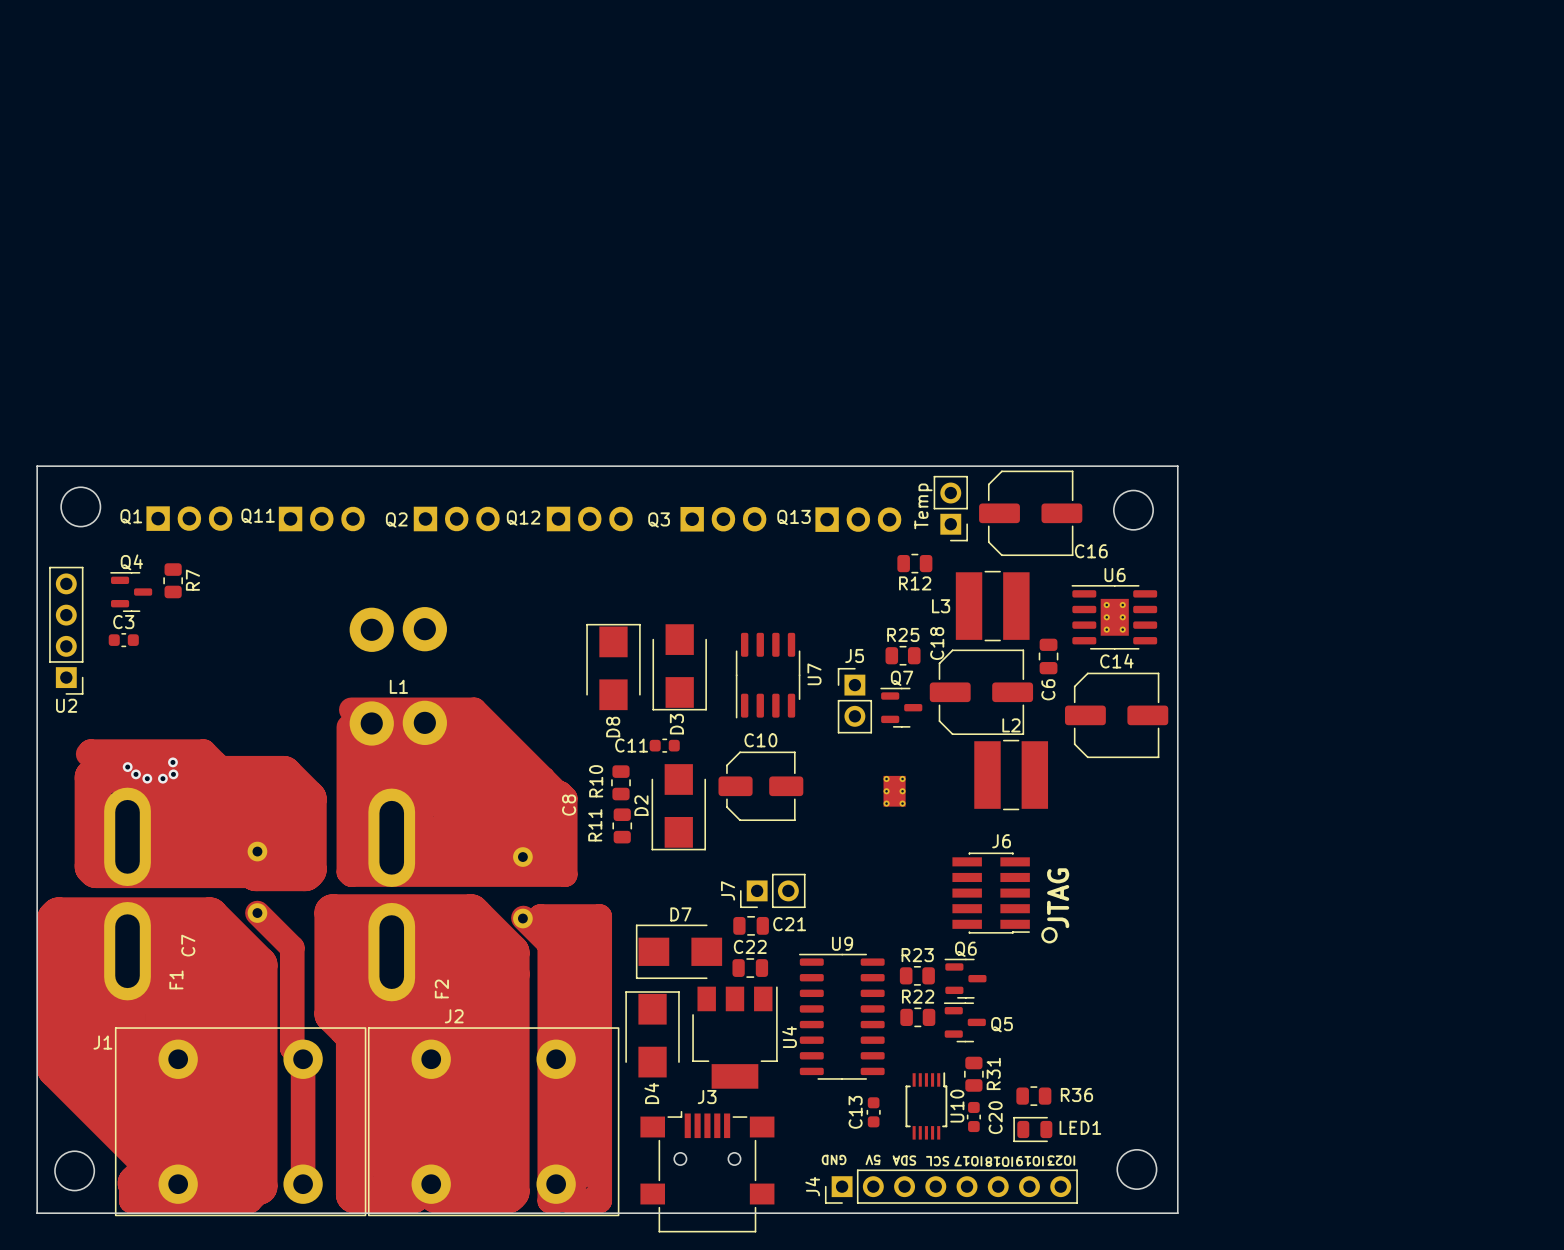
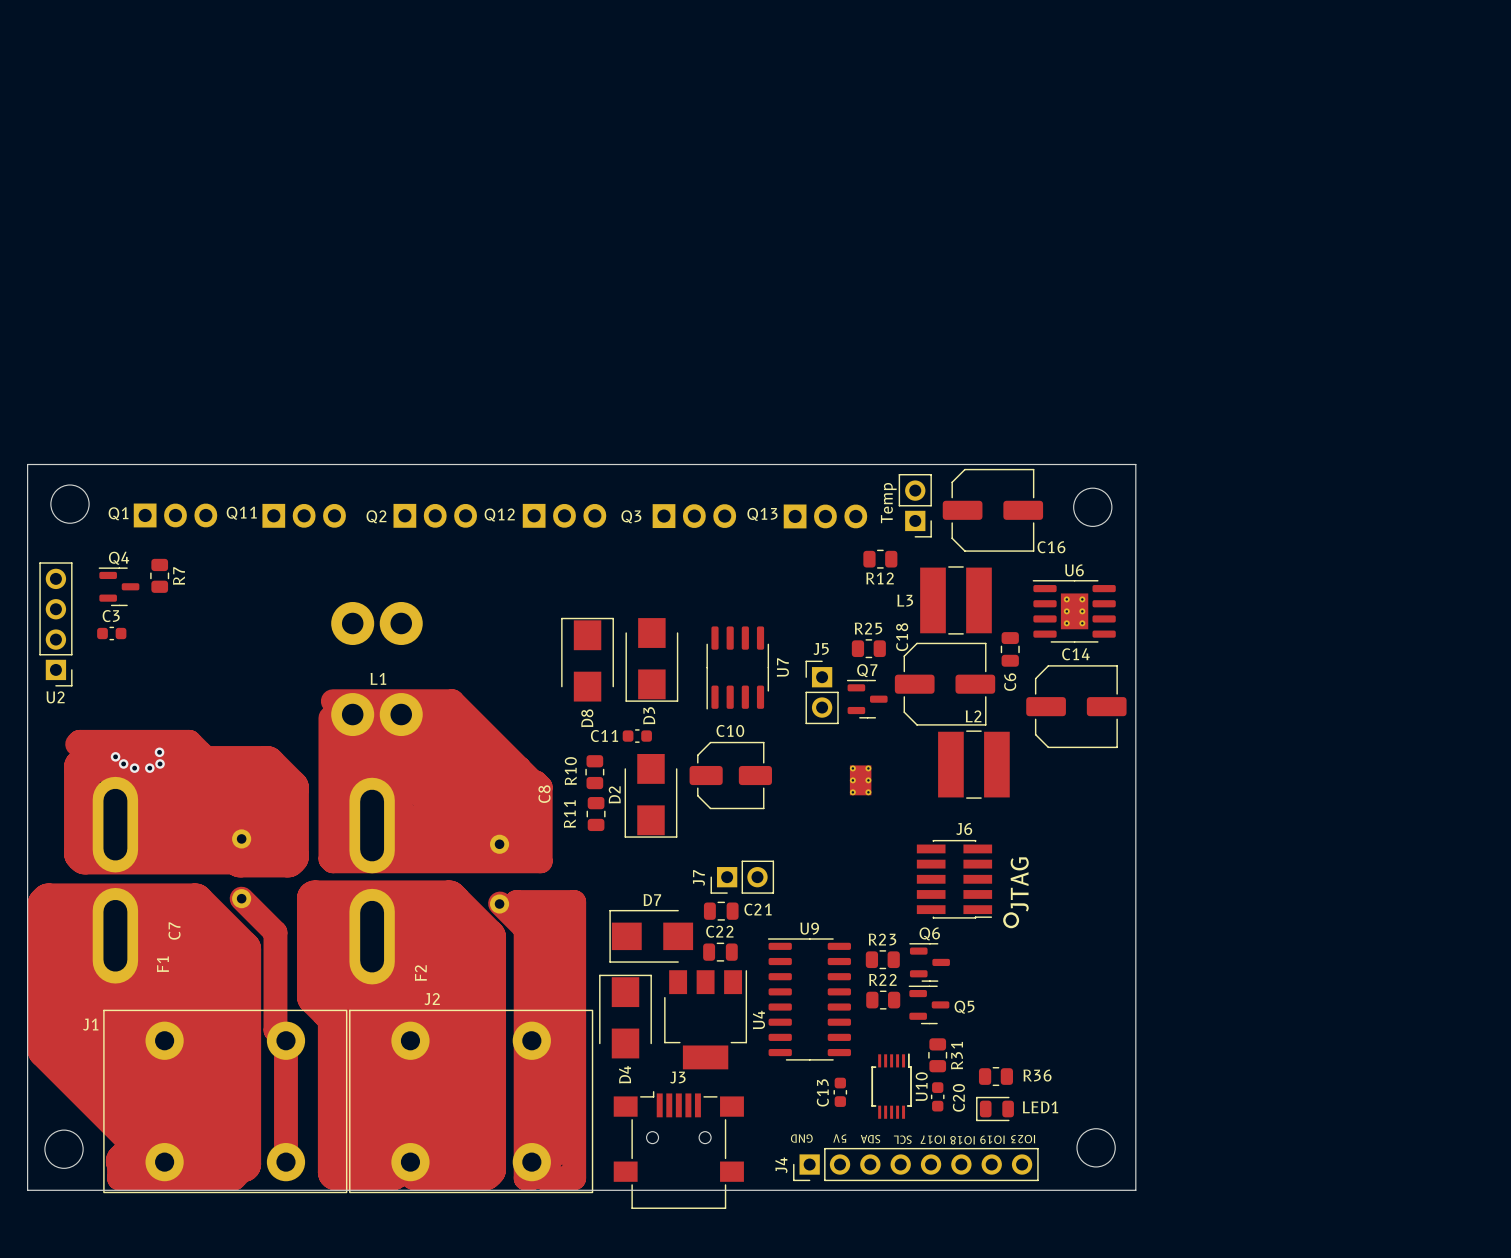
L1 footprint: [349, 607, 394, 746] -> [331, 601, 423, 737]
part: (424, 629) -> none
part: (424, 722) -> none

